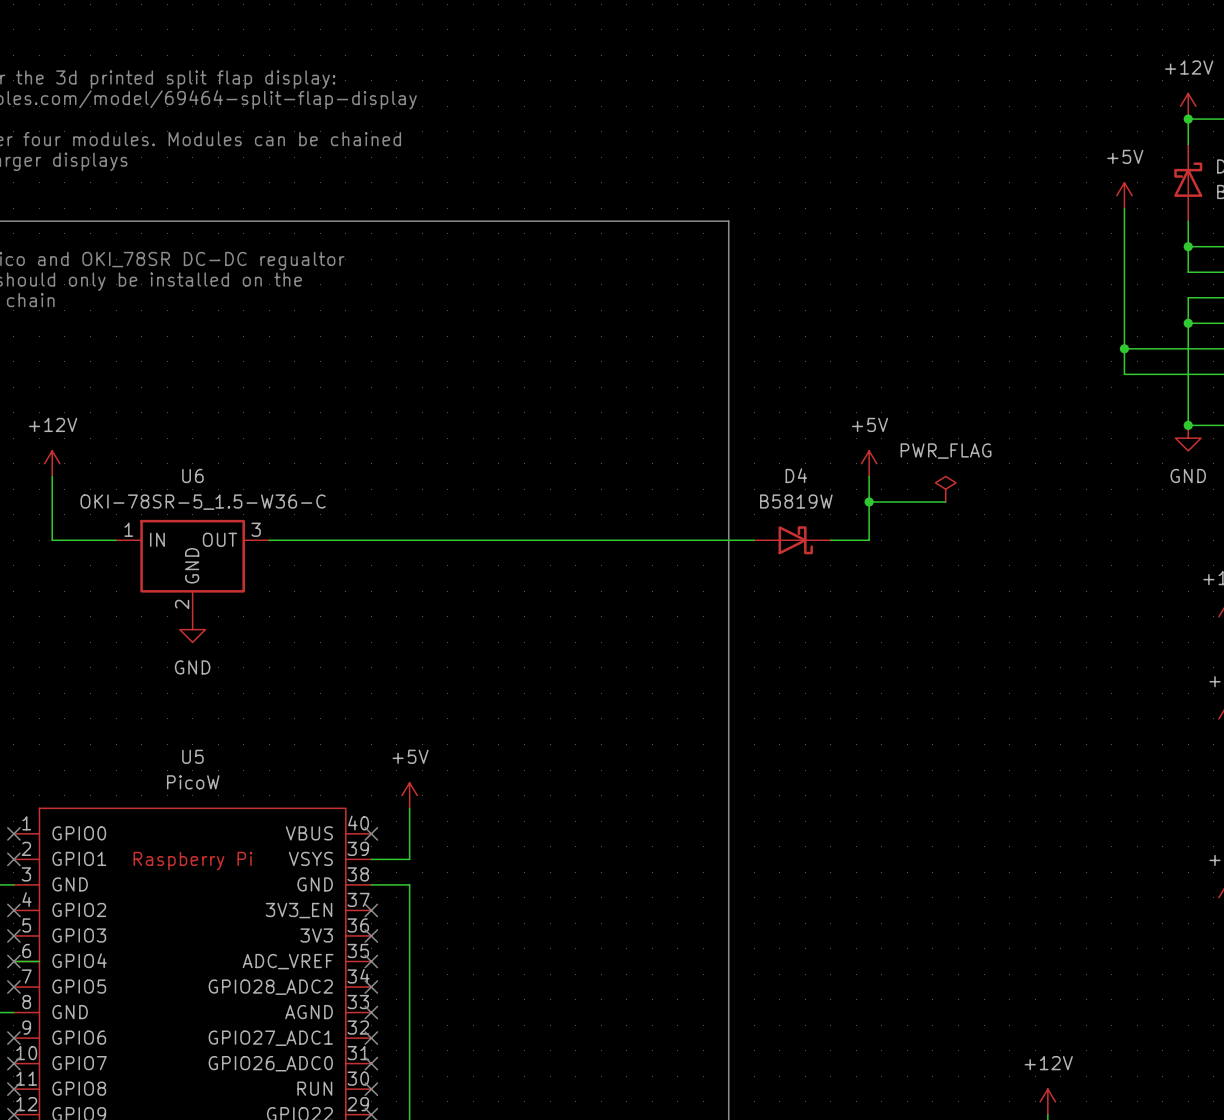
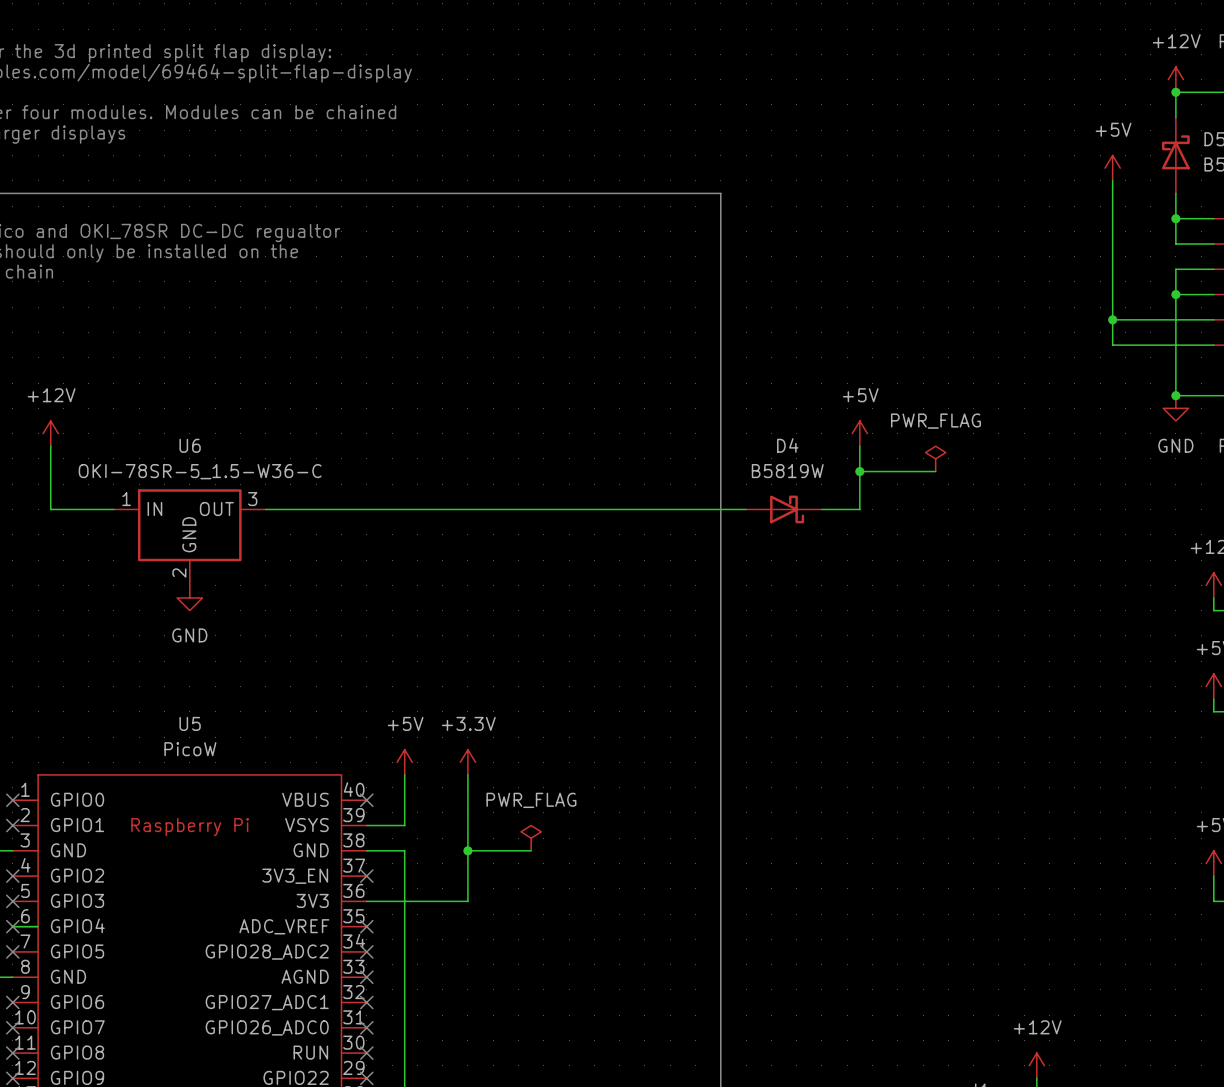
power symbol: none -> +3.3V (467, 762)
wire: none -> (467, 774) (467, 901) (366, 901)
power symbol: none -> PWR_FLAG (531, 838)
wire: none -> (467, 850) (531, 850)
junction: none -> (467, 850)
no-connect mark: (371, 935) -> none

